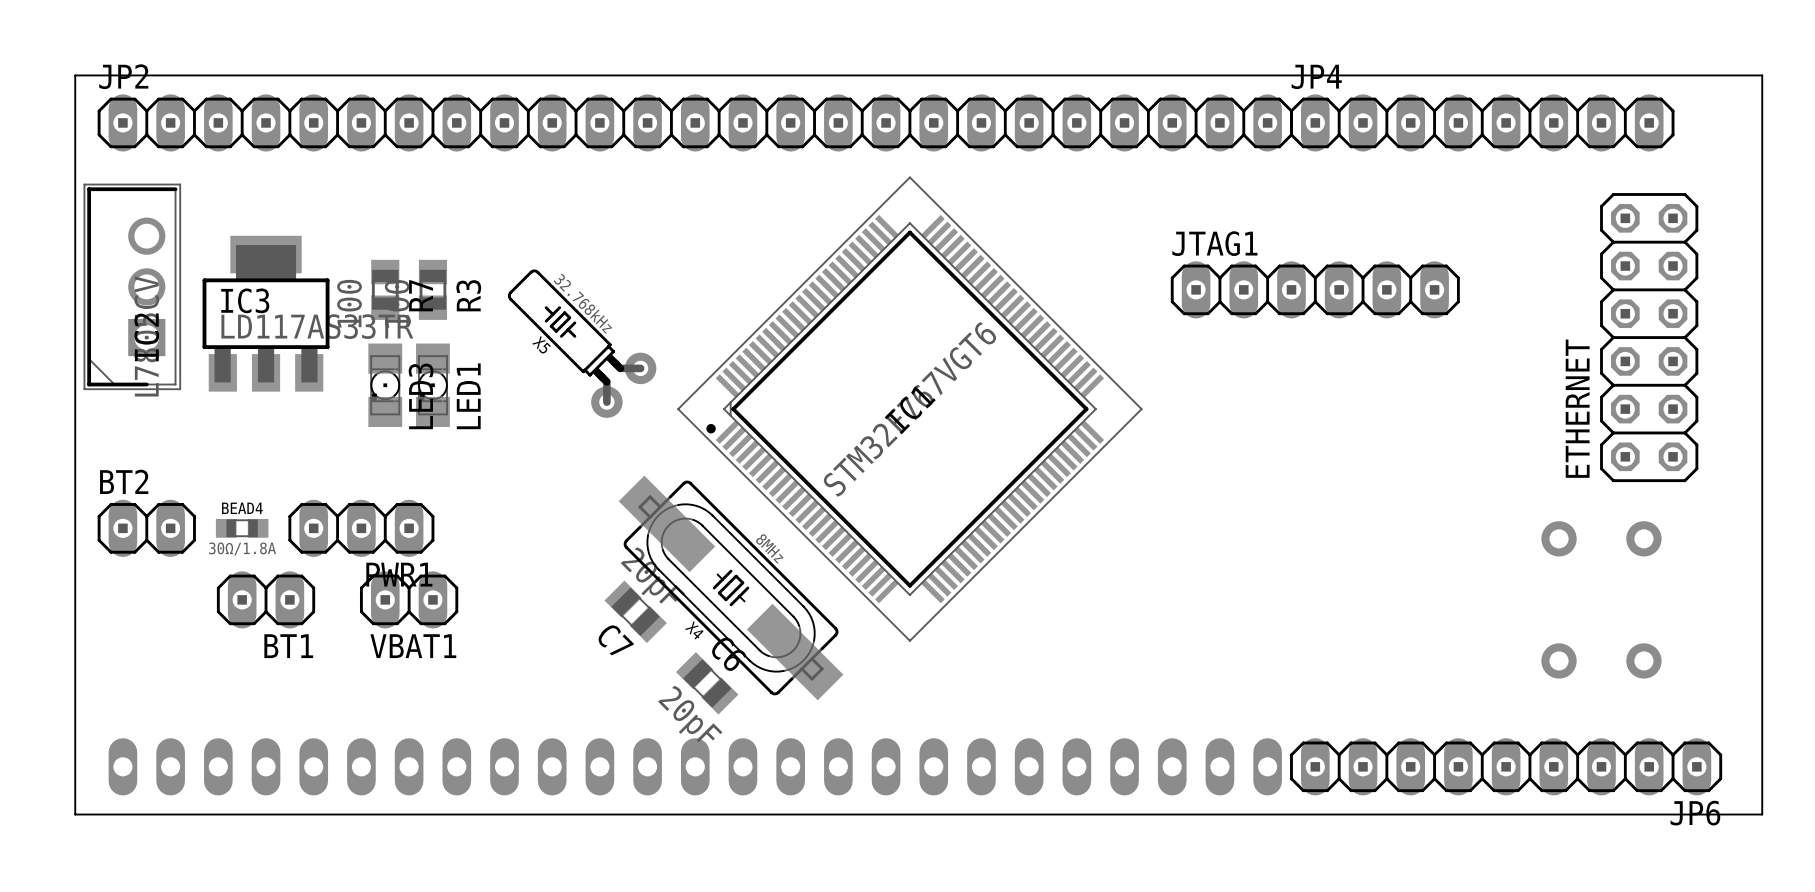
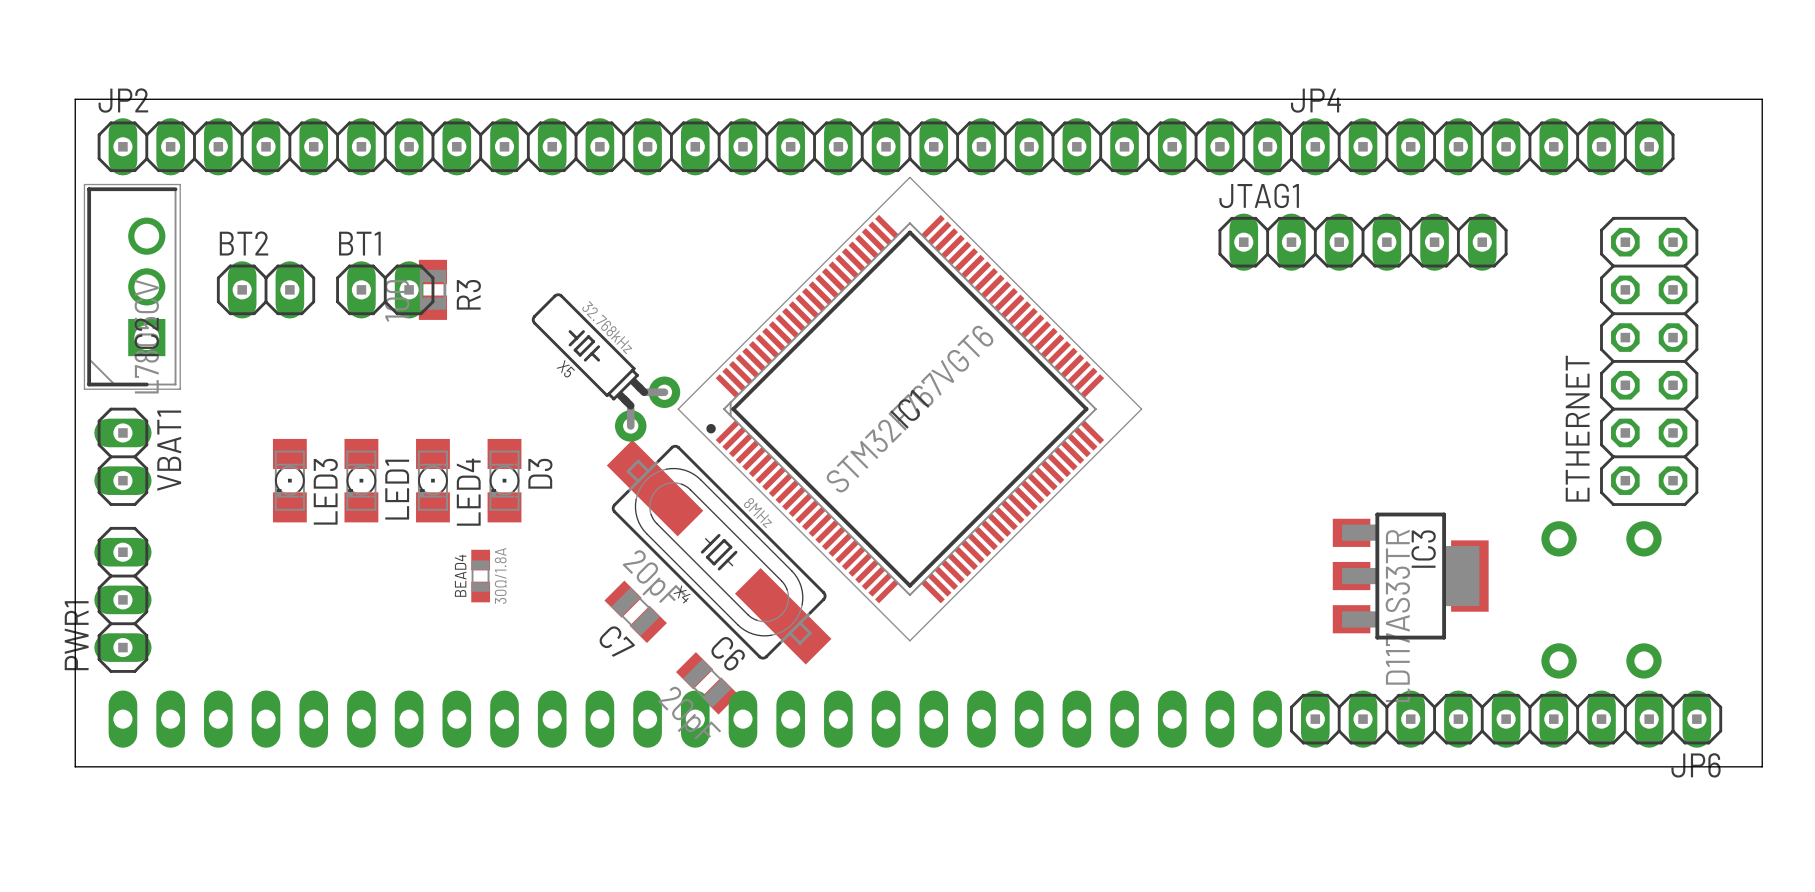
board edge: (75, 99) (75, 75) (1762, 75) (1762, 99) -> (75, 99) (1762, 99)
JP2 position: (695, 122) -> (695, 146)
JP4 position: (1482, 122) -> (1482, 146)
R7: 100 (385, 289) -> none
JTAG1 position: (1315, 289) -> (1363, 242)
IC3 rotation: 0° (266, 313) -> 90° clockwise (1410, 576)
IC3 position: (266, 313) -> (1410, 576)
ETHERNET position: (1649, 337) -> (1649, 361)
X5 position: (582, 343) -> (605, 367)
LED3 position: (385, 385) -> (289, 480)
LED1 position: (432, 385) -> (361, 480)
LED4: none -> (432, 480)
D3: none -> (504, 480)
BT2 position: (146, 528) -> (266, 289)
BEAD4 rotation: 0° (242, 528) -> 90° clockwise (480, 576)
BEAD4 position: (242, 528) -> (480, 576)
PWR1 rotation: 0° (361, 528) -> 90° clockwise (122, 599)
PWR1 position: (361, 528) -> (122, 599)
X4 position: (731, 587) -> (719, 552)
BT1 position: (266, 599) -> (385, 289)
VBAT1 rotation: 0° (409, 599) -> 90° clockwise (122, 456)
VBAT1 position: (409, 599) -> (122, 456)
BT1 name position: BT1 (288, 646) -> BT1 (359, 243)
VBAT1 name position: VBAT1 (413, 646) -> VBAT1 (169, 450)
board edge: (75, 766) (75, 814) (1762, 814) (1762, 766) -> (75, 766) (1762, 766)
part position: (695, 766) -> (695, 719)
JP6 position: (1506, 766) -> (1506, 719)

